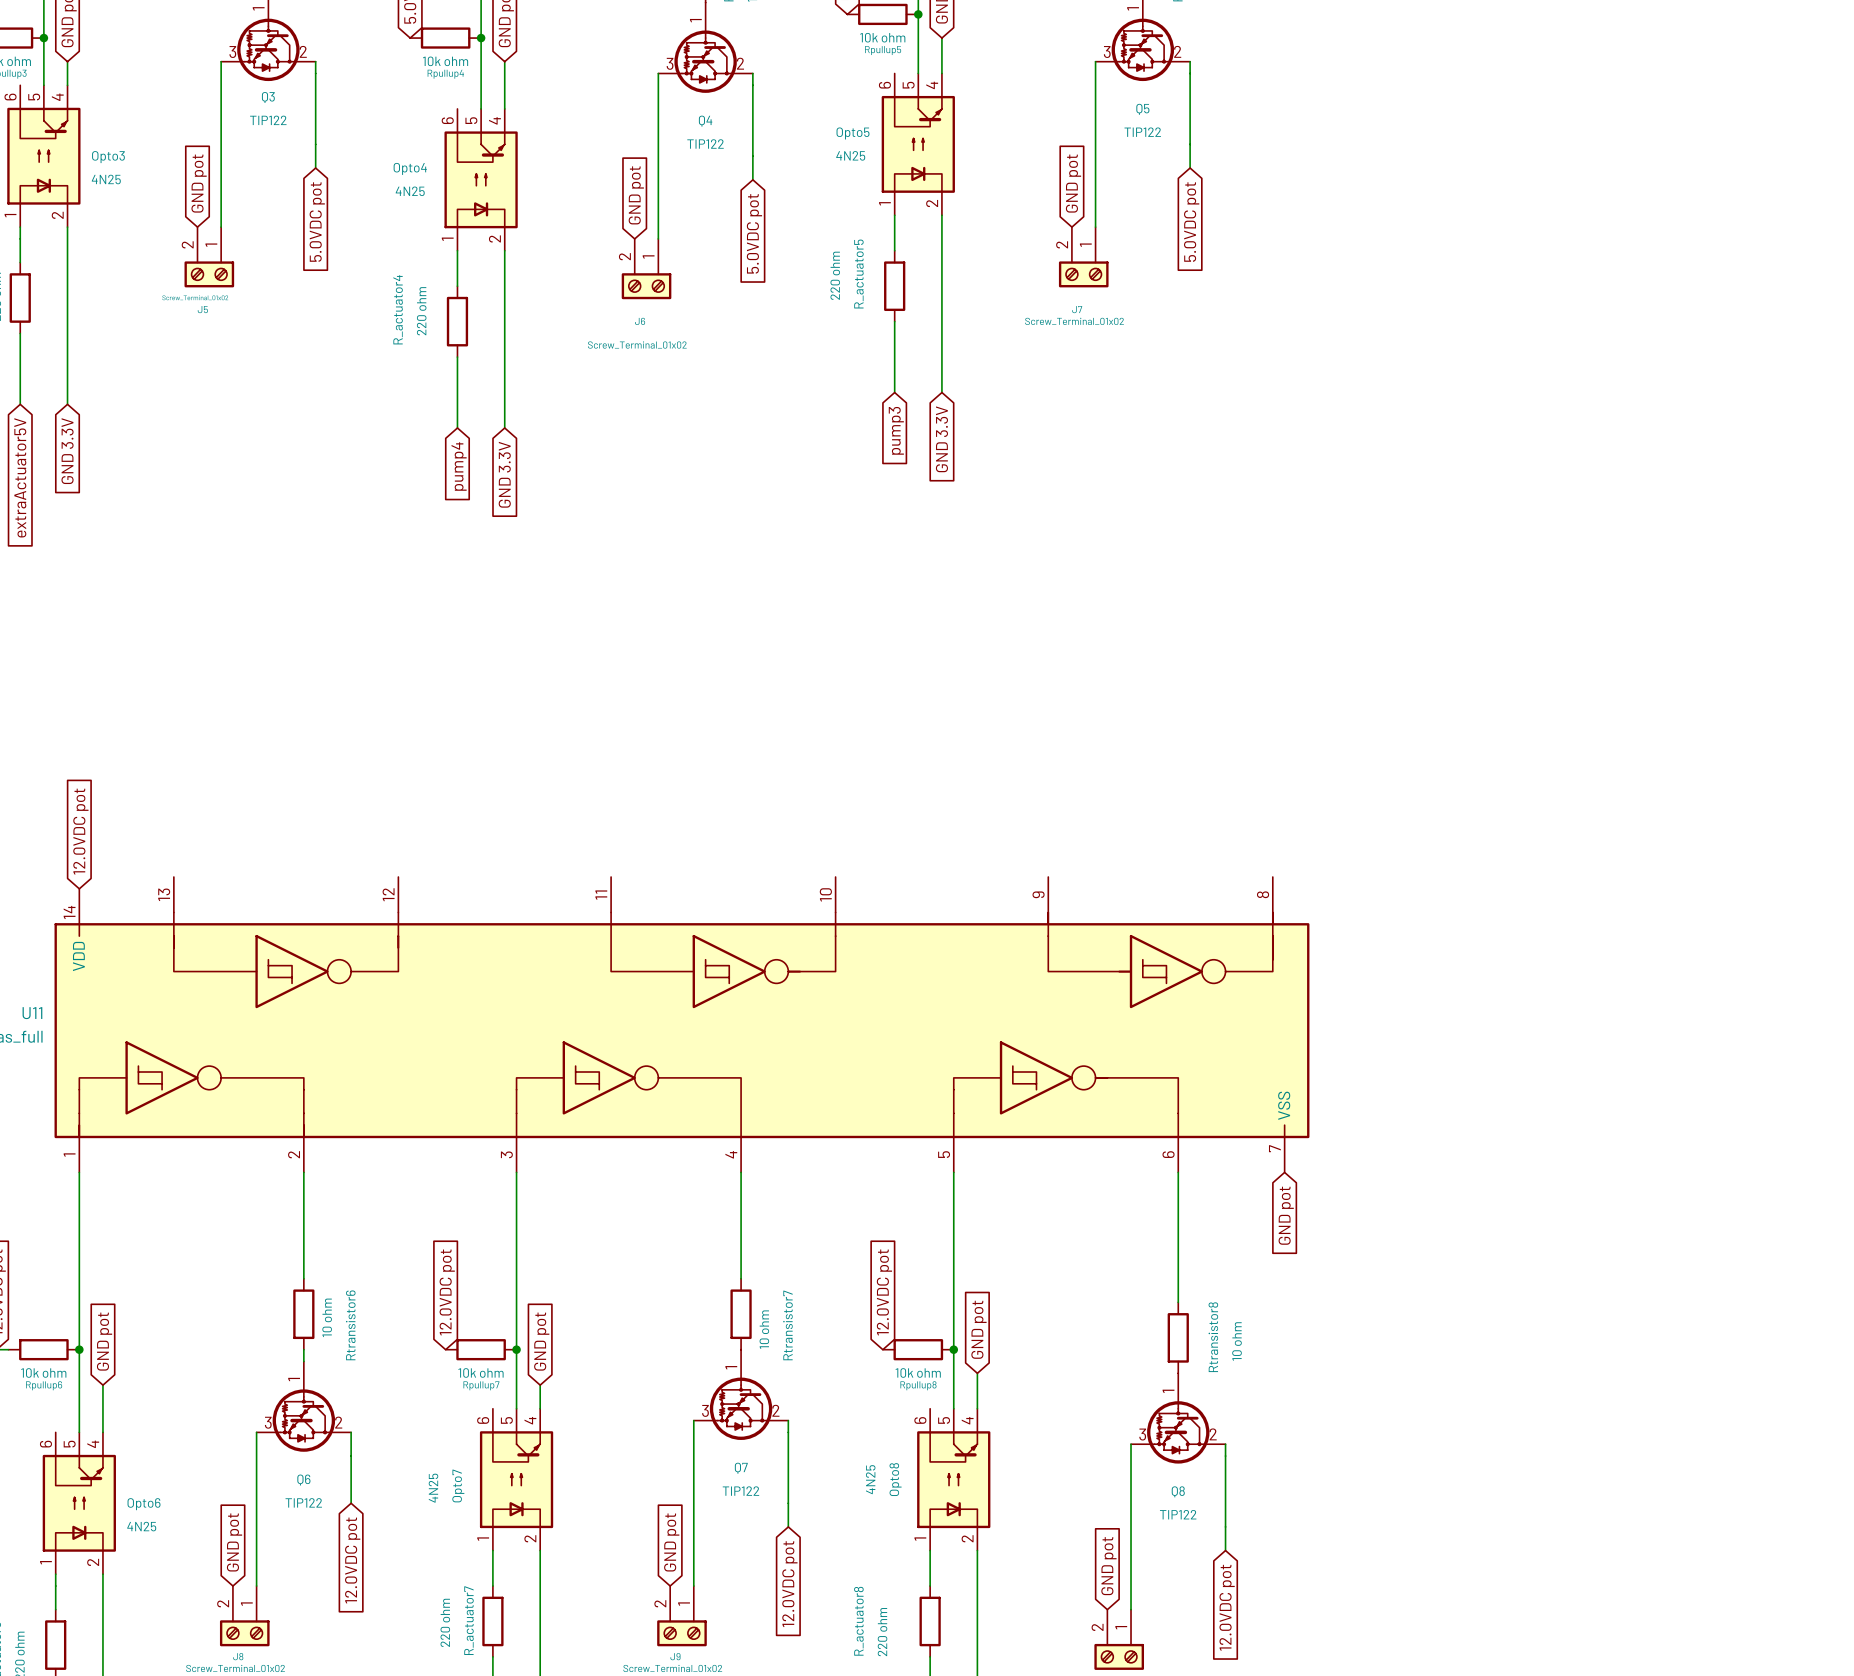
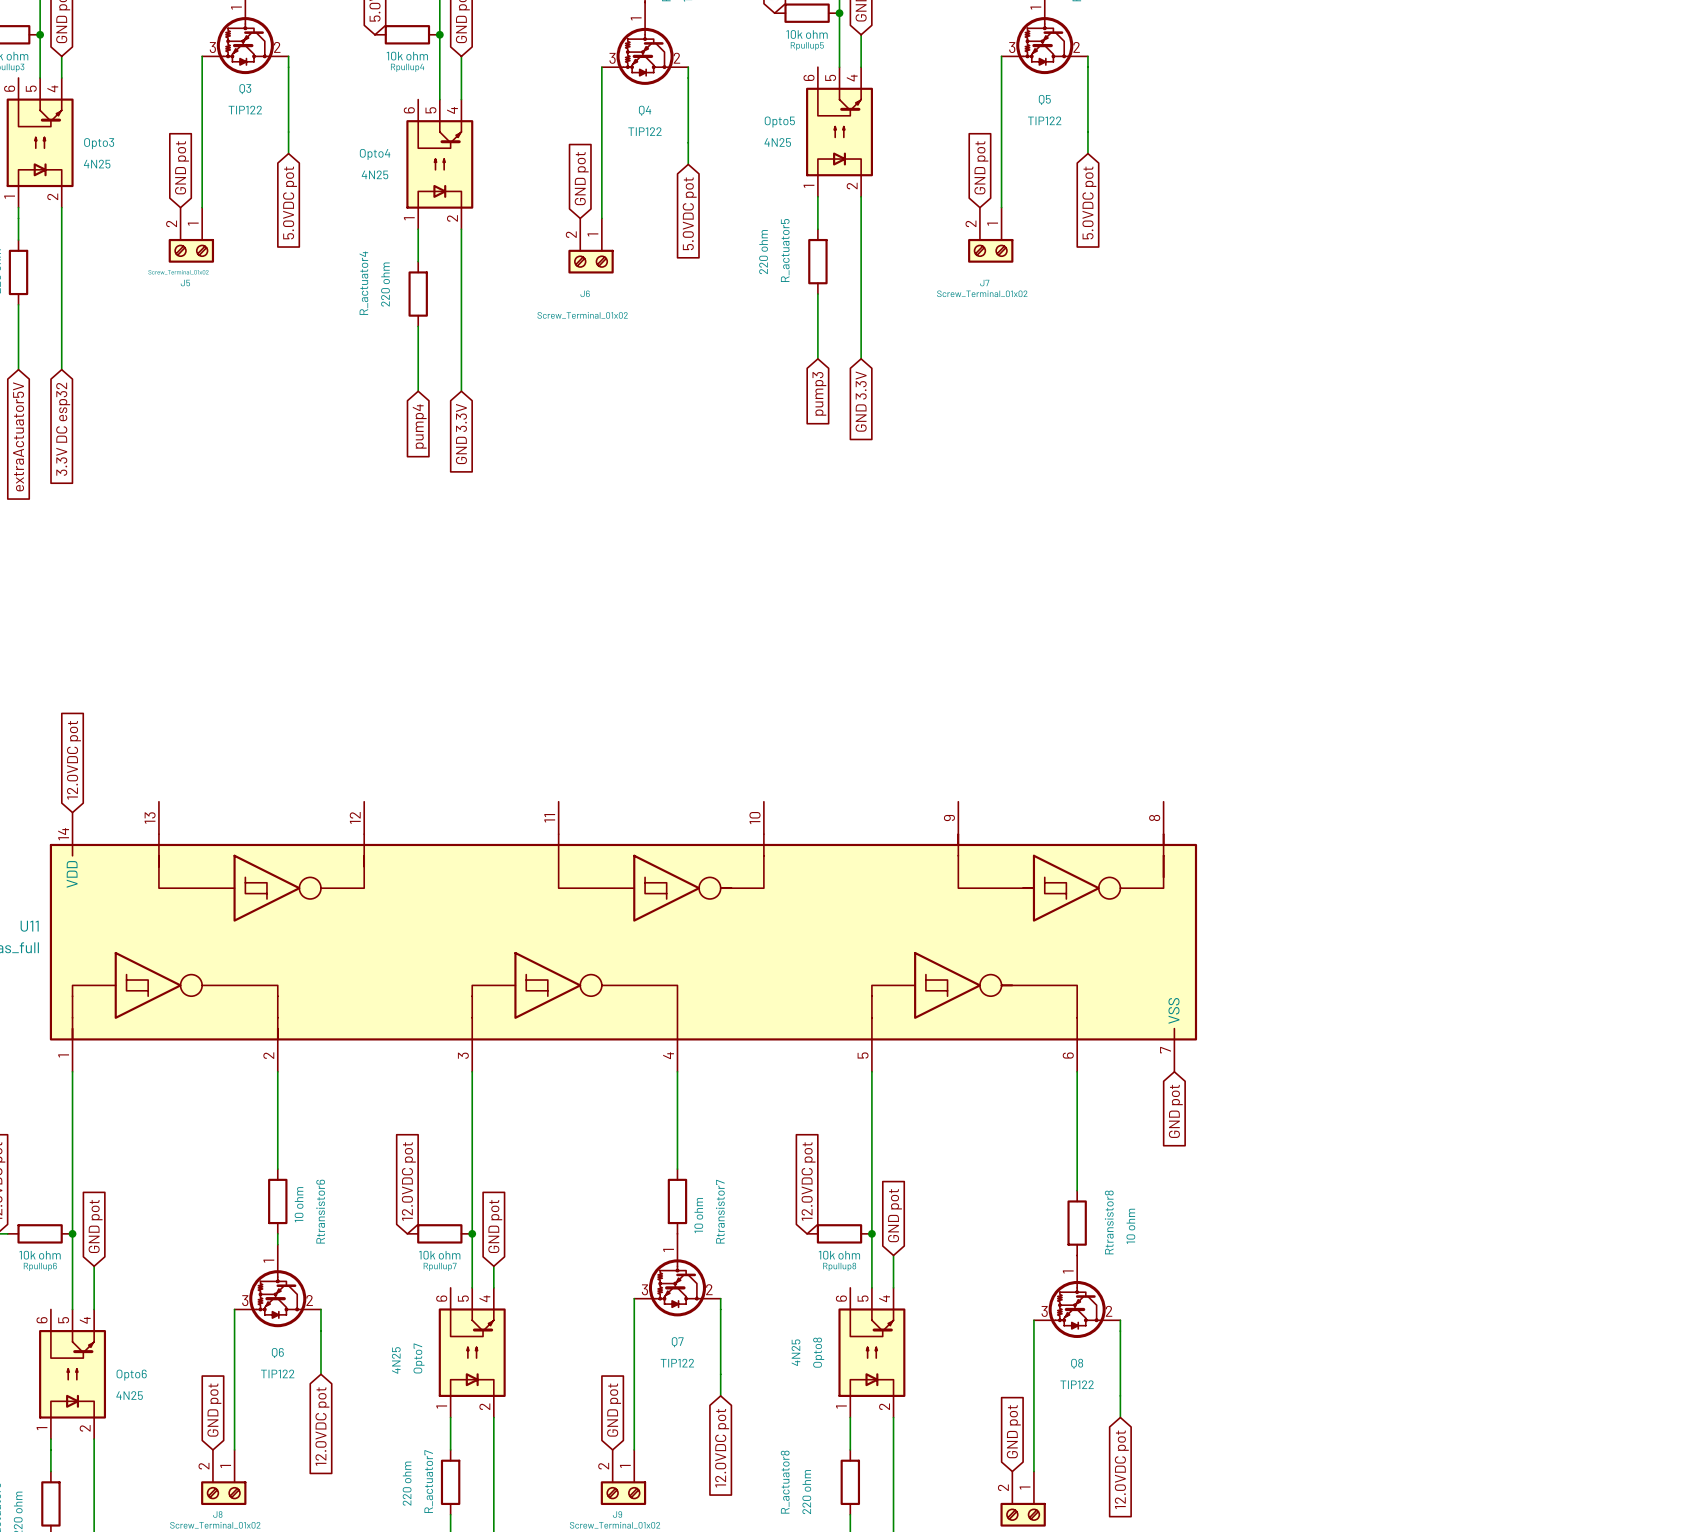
global label: GND 3.3V (67, 451) -> 3.3V DC esp32 (63, 429)

